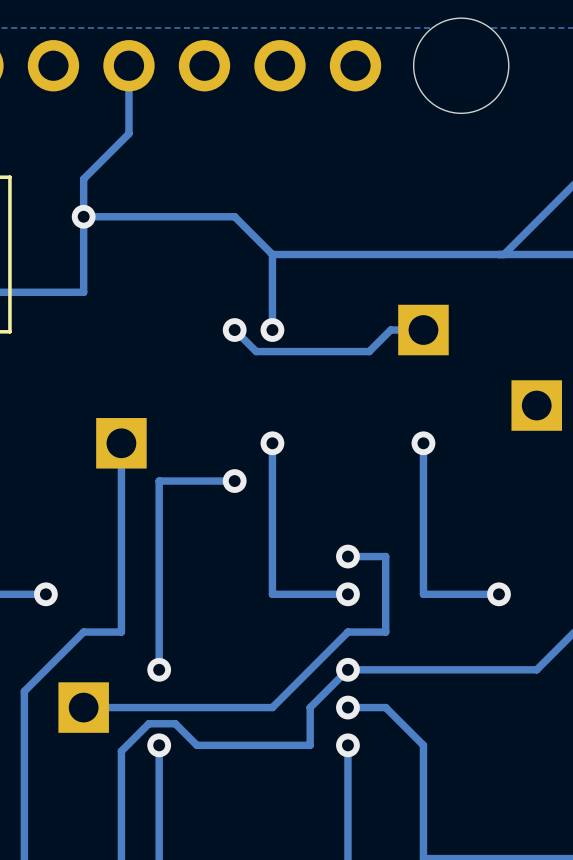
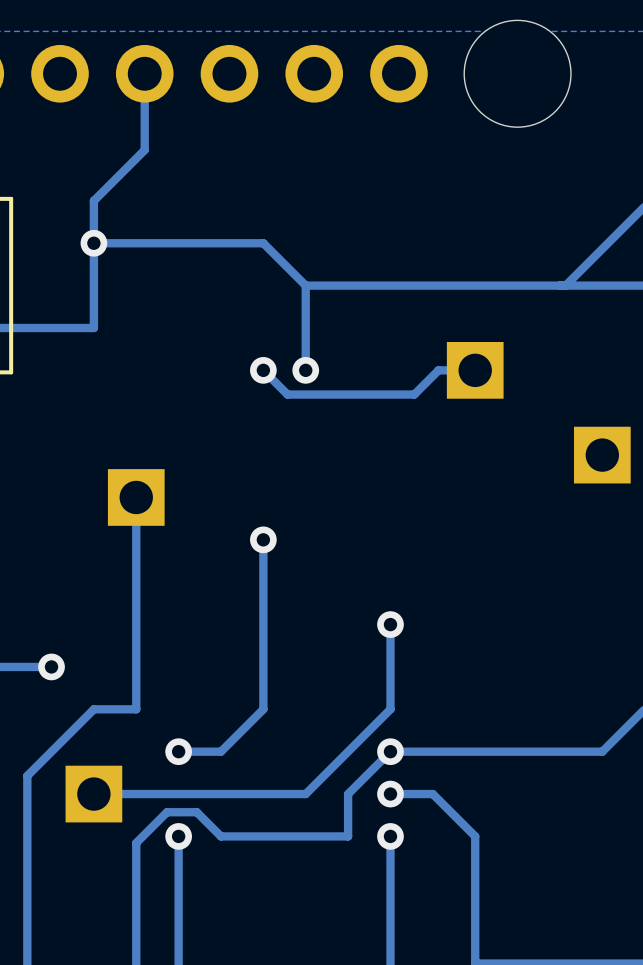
track: (272, 443) (272, 594) (347, 594) -> none
via: (272, 443) -> none
track: (423, 443) (423, 594) (498, 594) -> none
via: (423, 443) -> none
track: (234, 481) (159, 481) (159, 669) -> (263, 539) (263, 709) (221, 751) (178, 751)
track: (347, 556) (385, 556) (385, 632) (347, 632) -> (390, 624) (390, 709)
via: (347, 594) -> none
via: (498, 594) -> none

